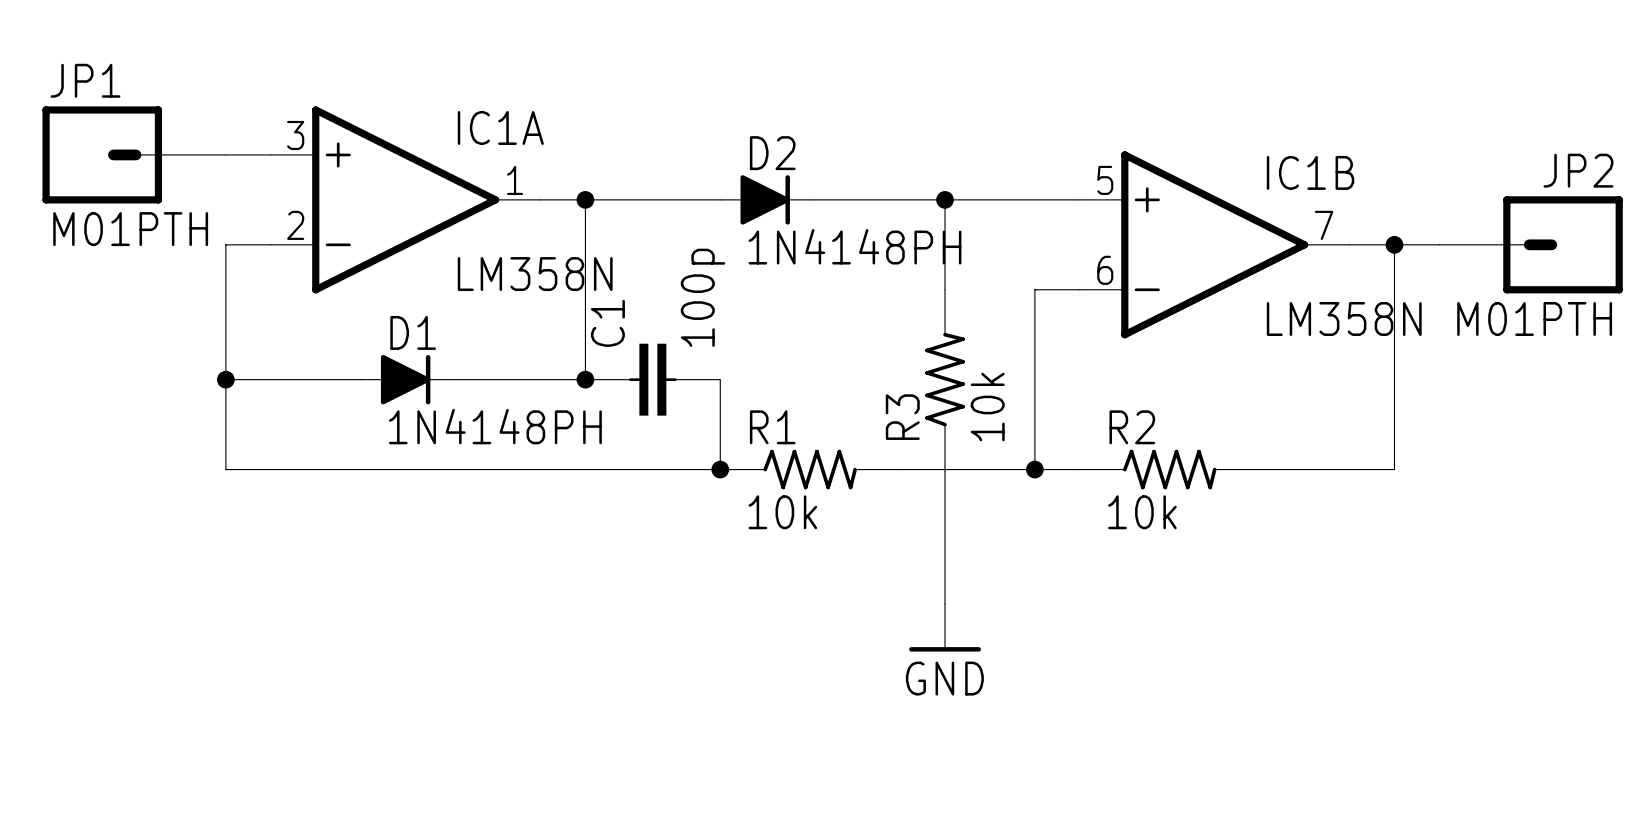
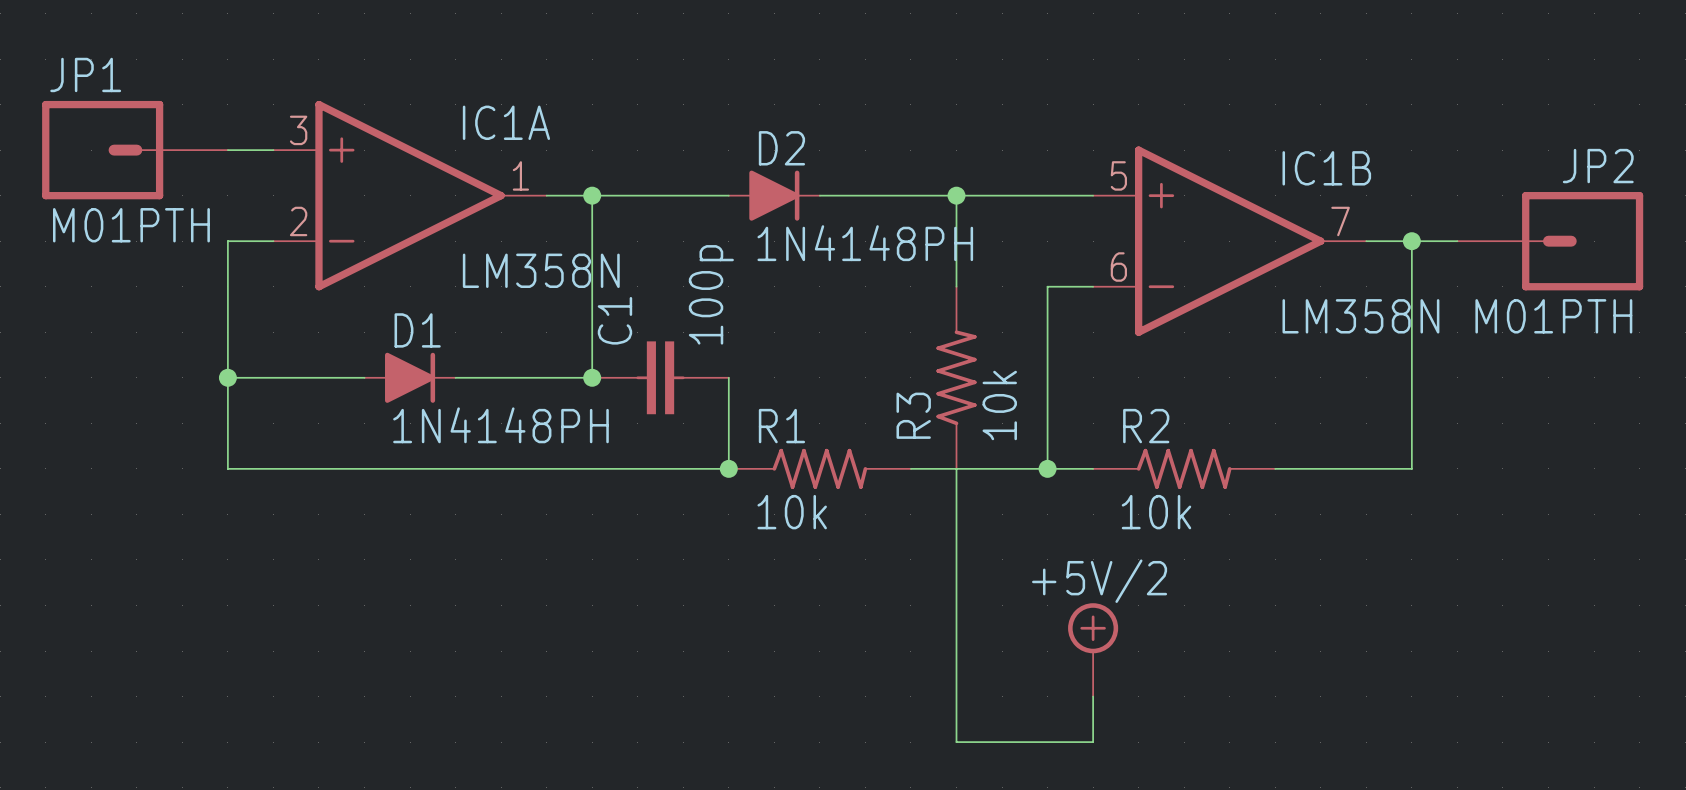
wire: none -> (956, 605) (956, 742) (1093, 742) (1093, 696)
power symbol: GND (945, 628) -> none
power symbol: none -> +5V/2 (1093, 649)

